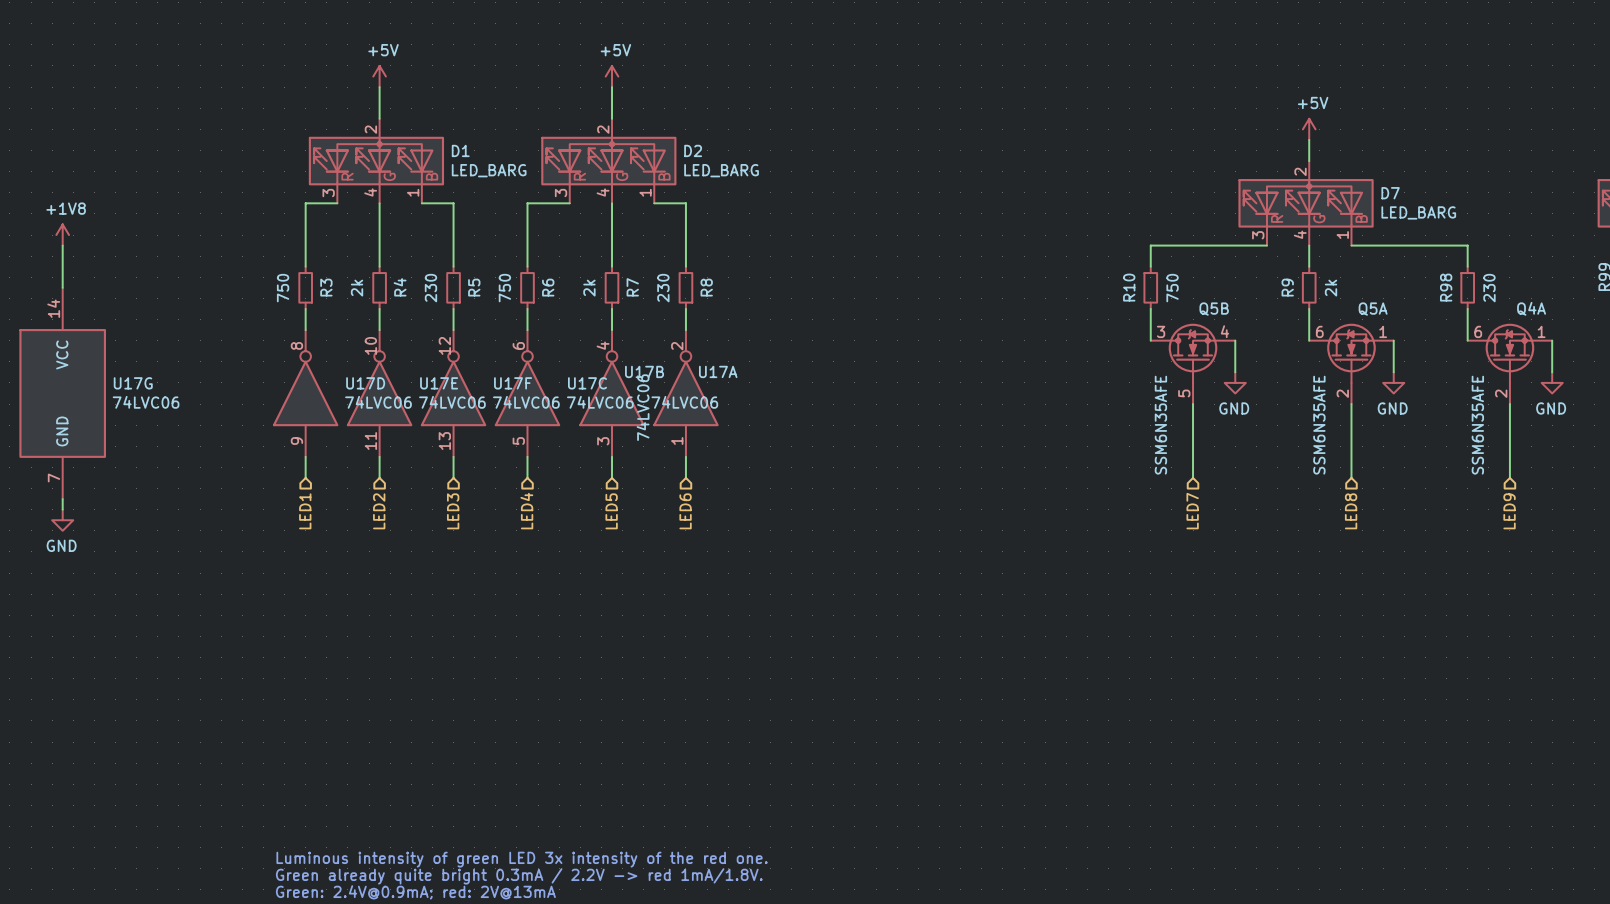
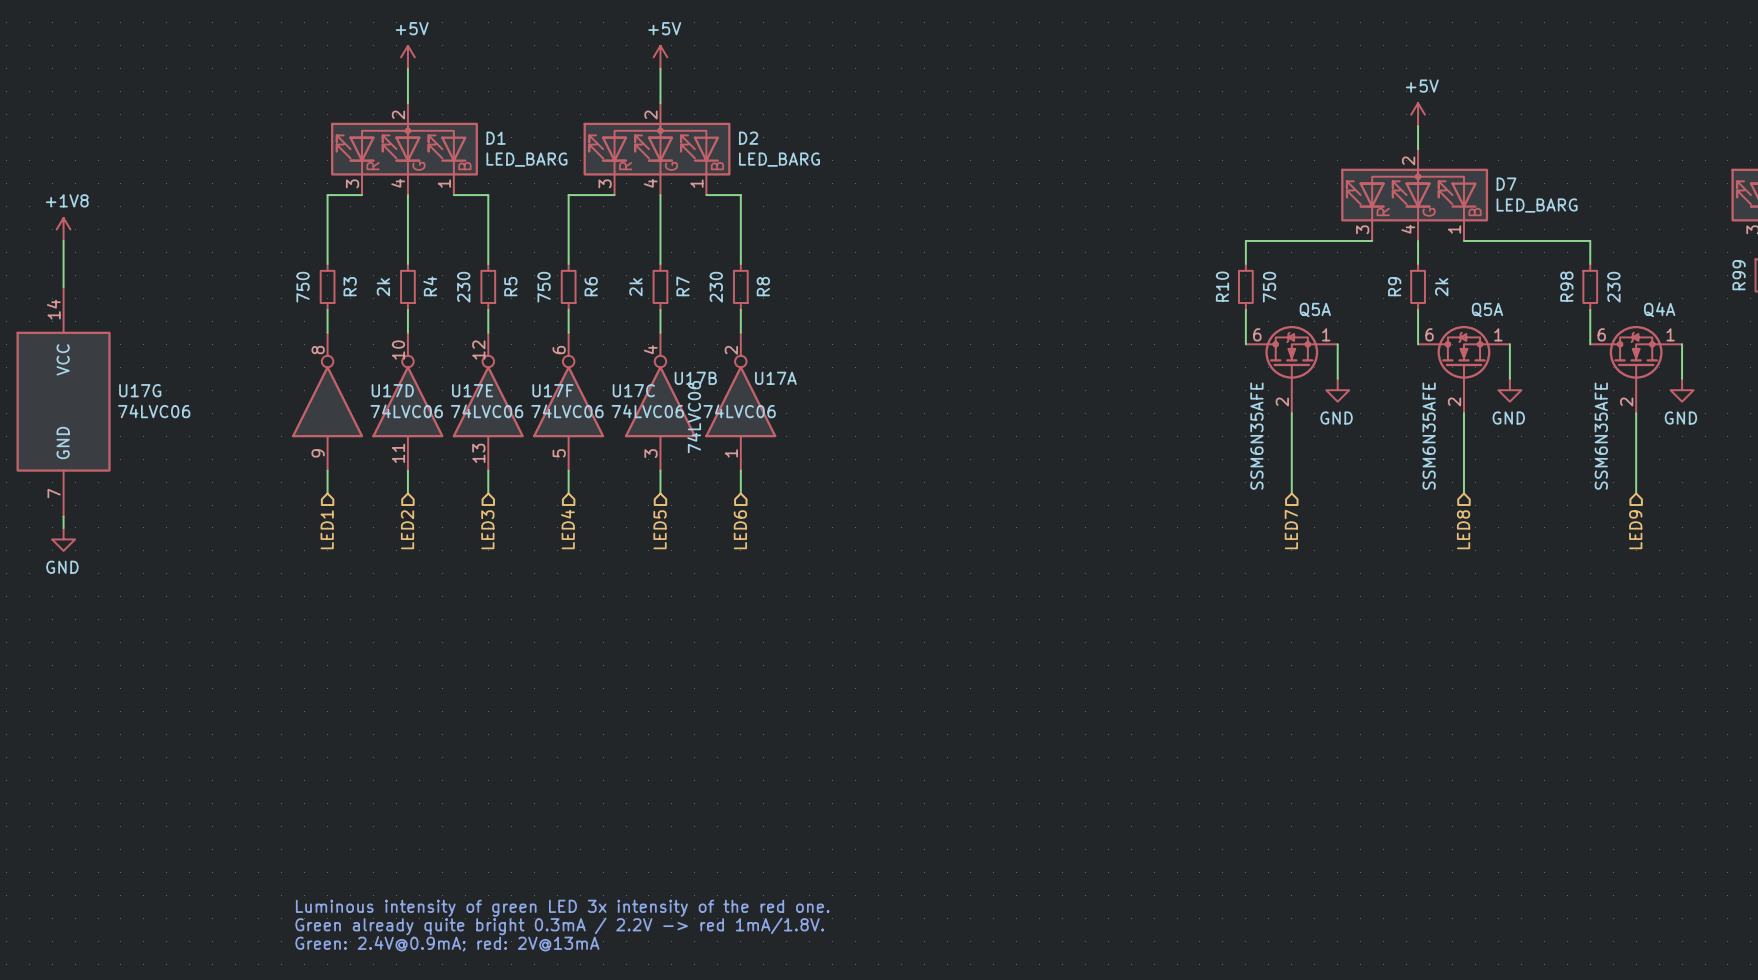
Q5B name: Q5B (1214, 309) -> Q5A (1315, 309)
Q5B pin number: 3 (1161, 331) -> 6 (1257, 334)
Q5B pin number: 4 (1224, 331) -> 1 (1326, 334)
Q5B pin number: 5 (1184, 393) -> 2 (1282, 401)

